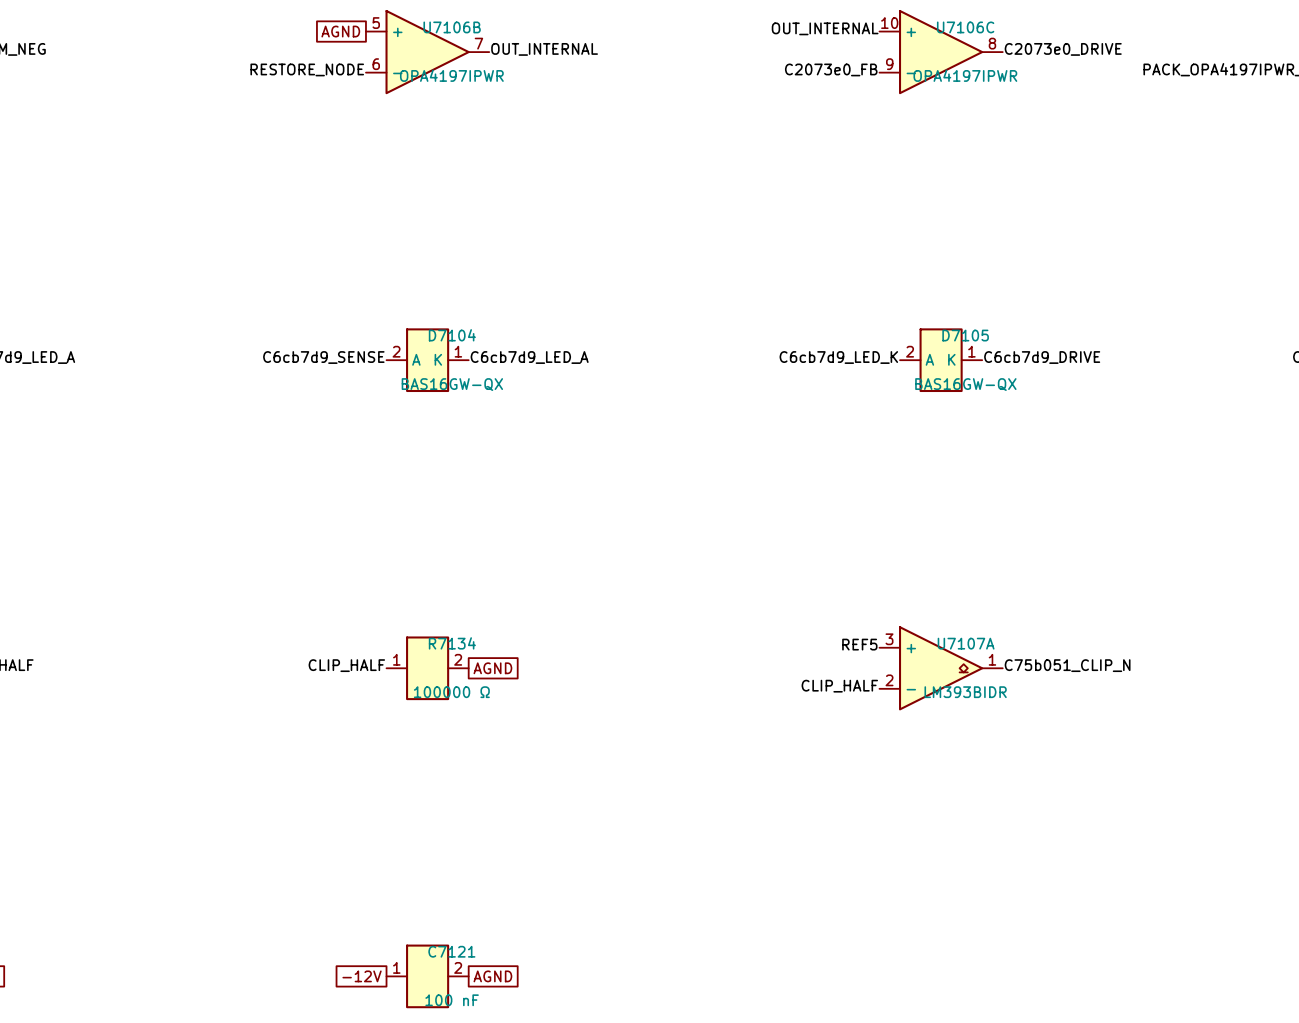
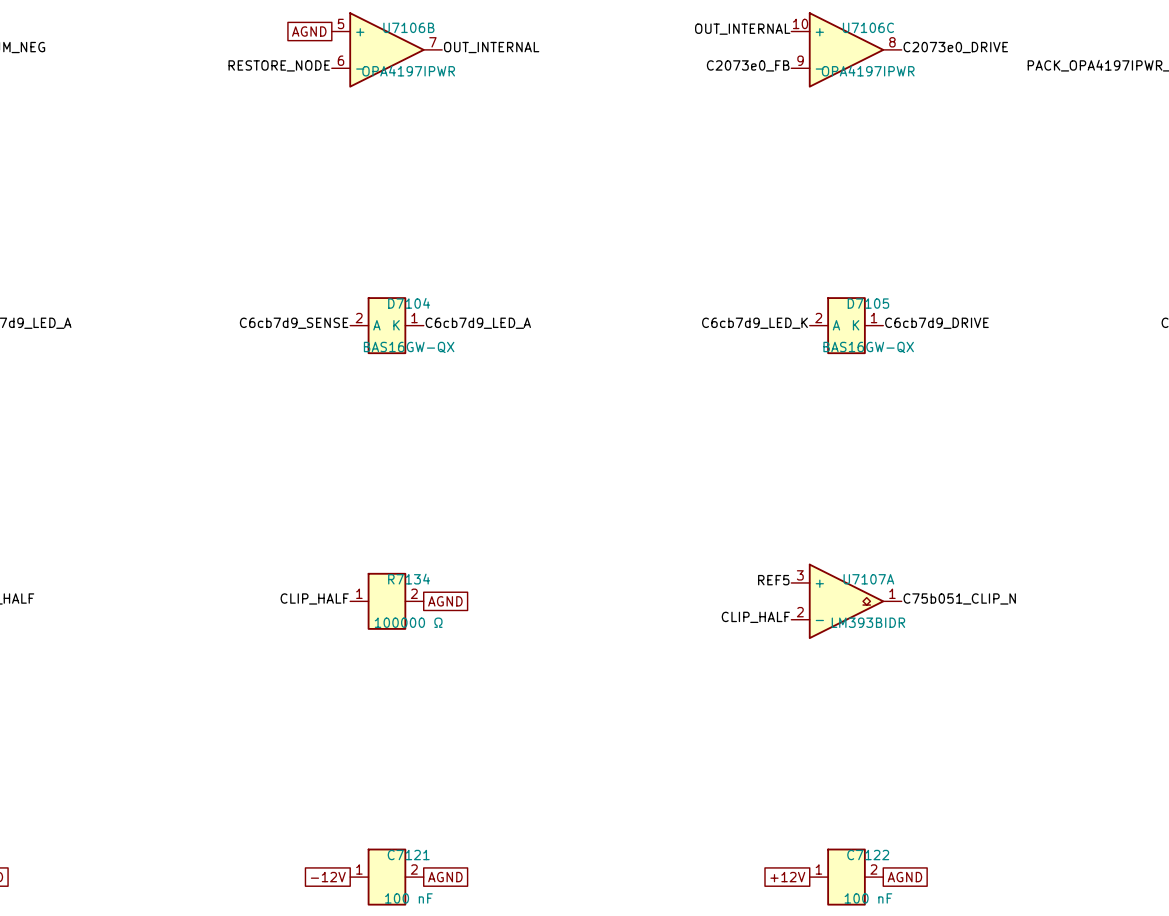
global label: none -> +12V (787, 877)
C7122: none -> 100 nF (846, 877)
global label: none -> AGND (904, 877)

